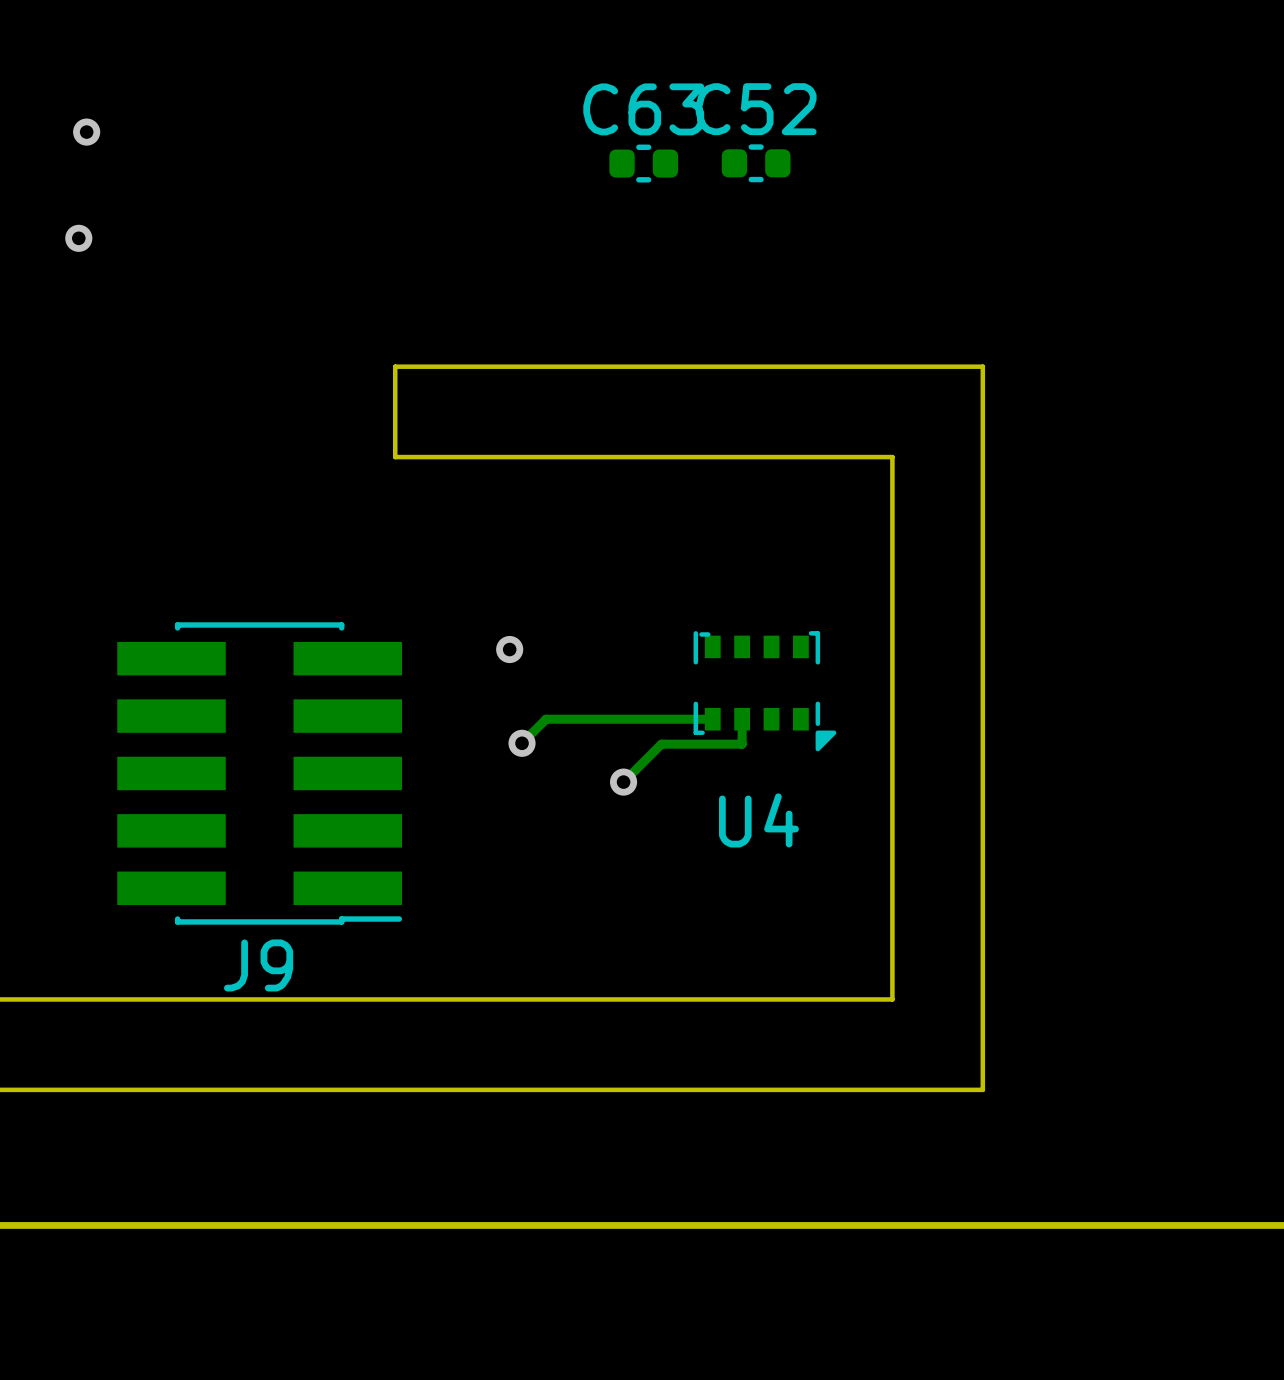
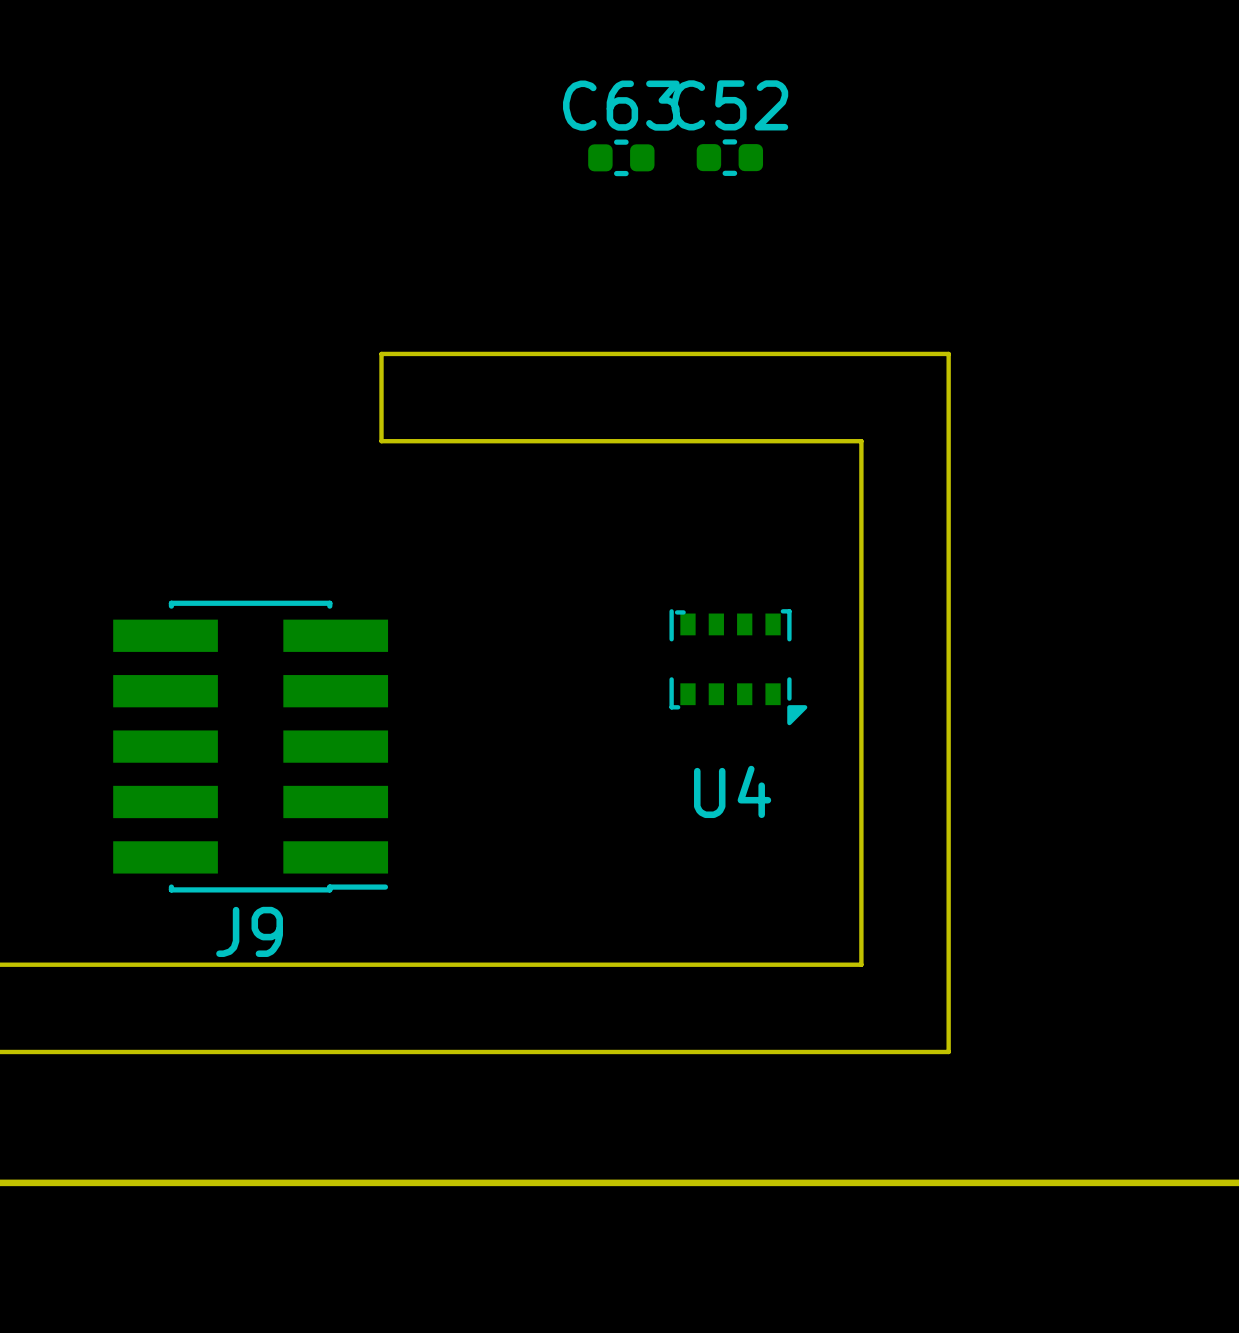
via: (86, 132) -> none
via: (78, 238) -> none
via: (509, 649) -> none
track: (712, 719) (546, 719) (522, 743) -> none
track: (742, 719) (742, 744) (661, 744) (623, 782) -> none
via: (522, 743) -> none
via: (623, 782) -> none

